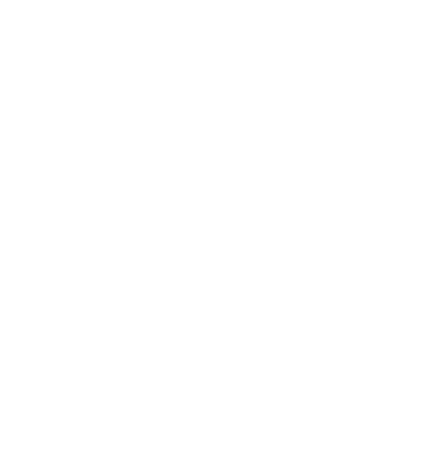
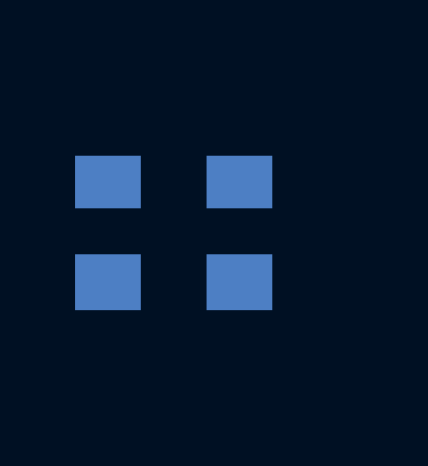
part: none -> (173, 182)
part: none -> (173, 282)

